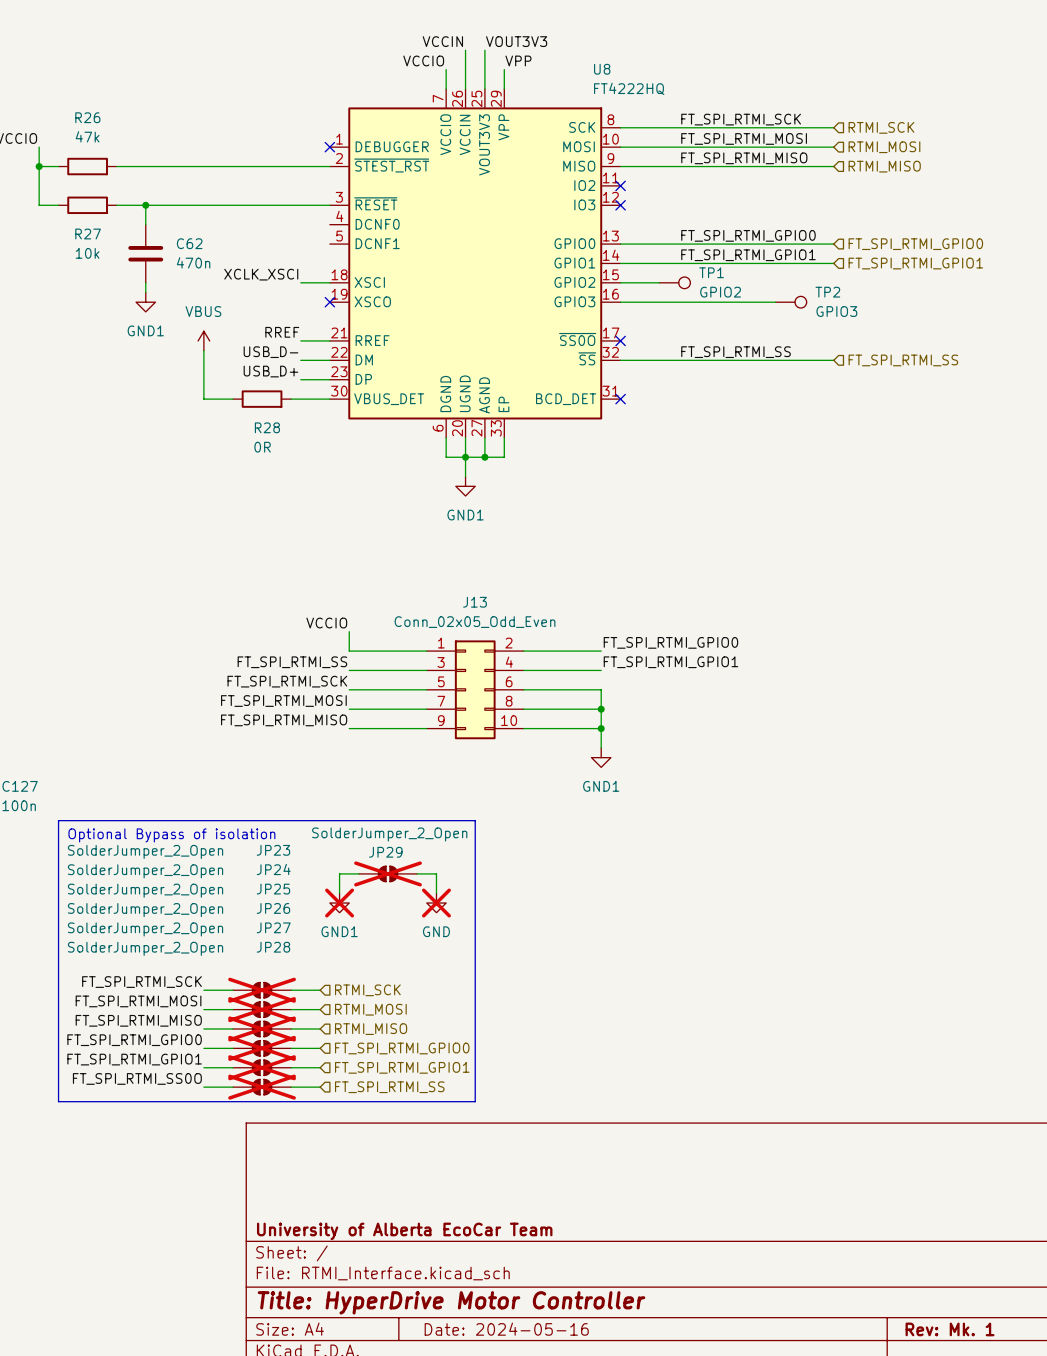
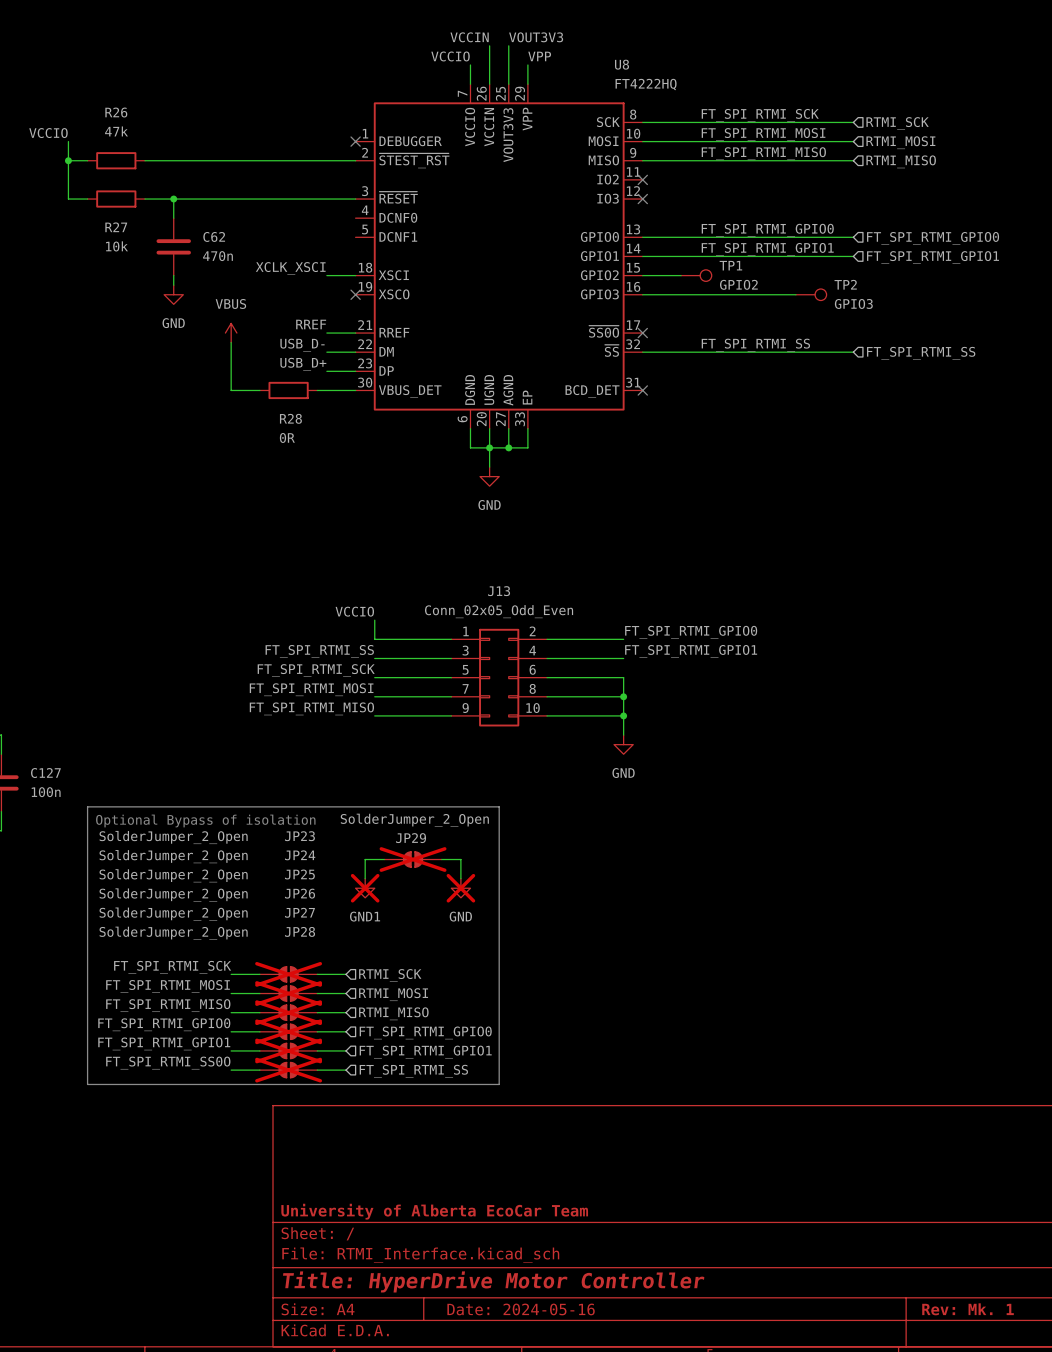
power symbol: GND1 (145, 302) -> GND (173, 294)
power symbol: GND1 (465, 486) -> GND (489, 476)
power symbol: GND1 (601, 757) -> GND (623, 744)

